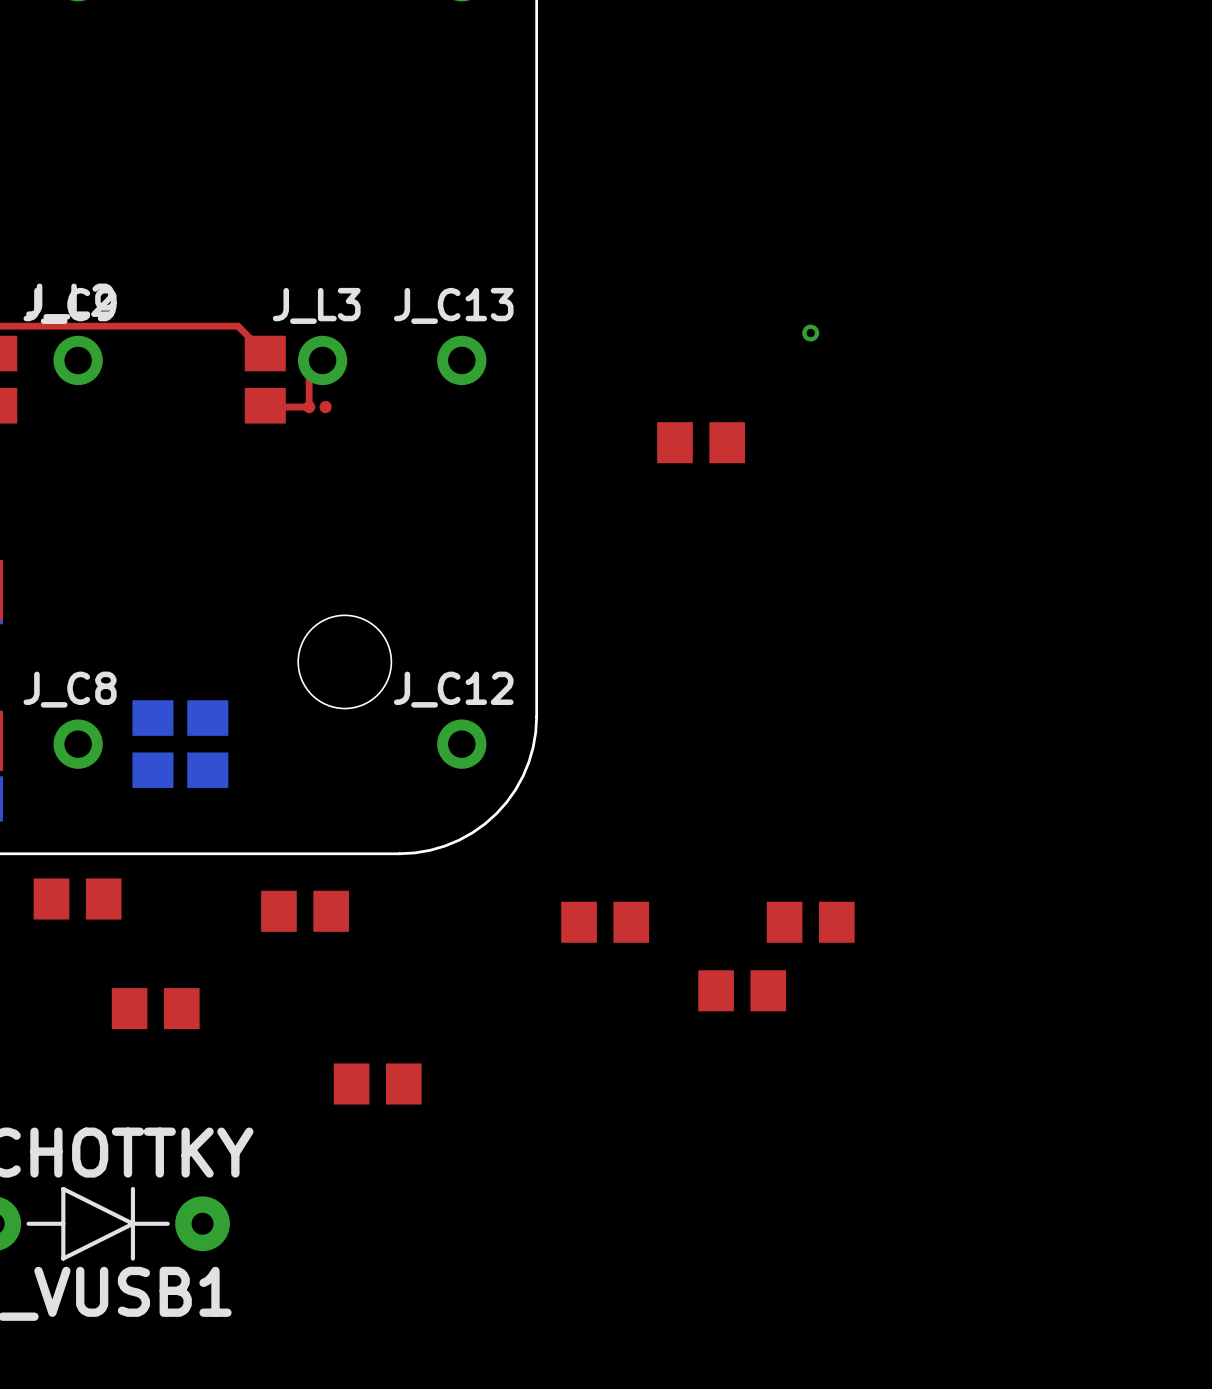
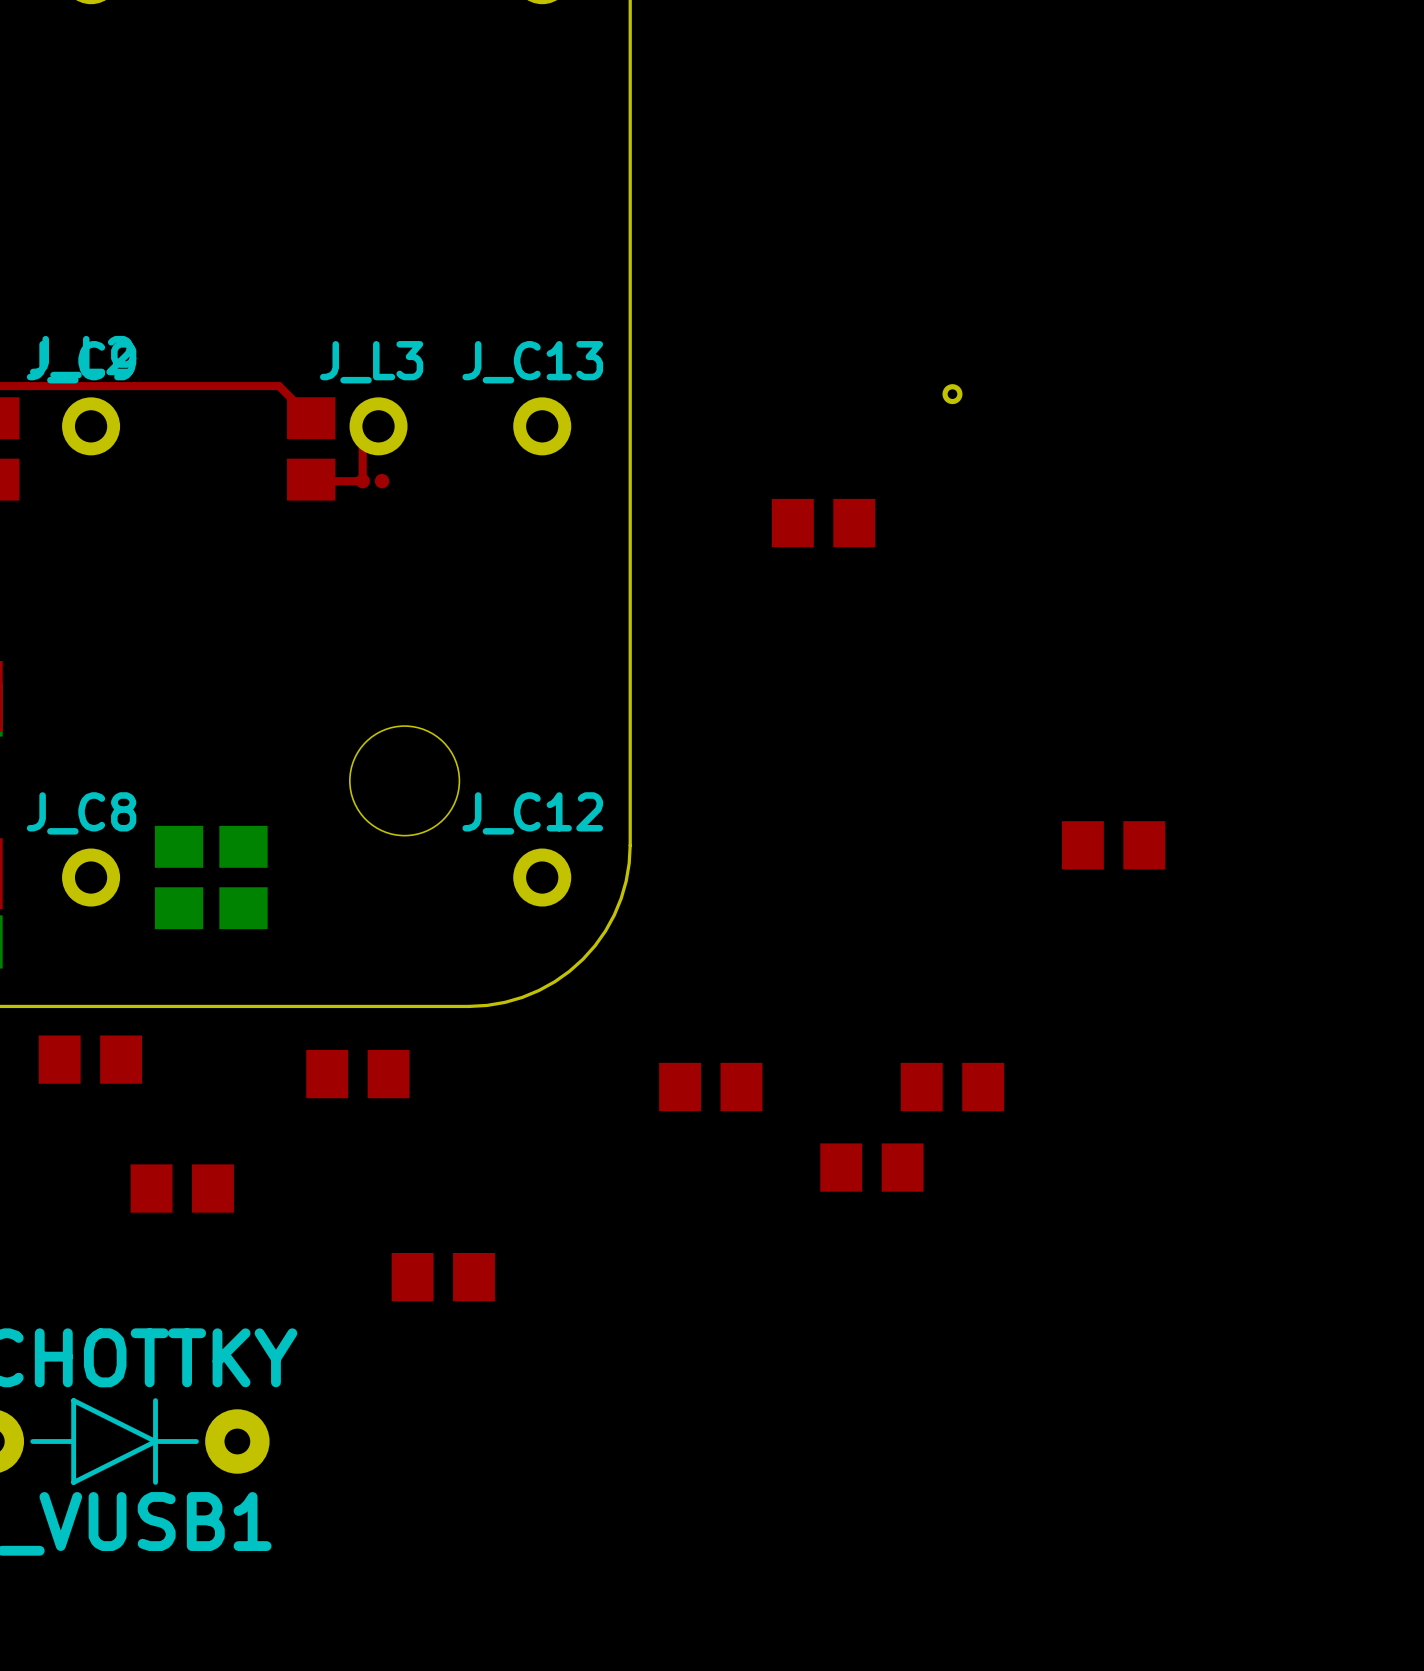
part: none -> (1113, 845)

